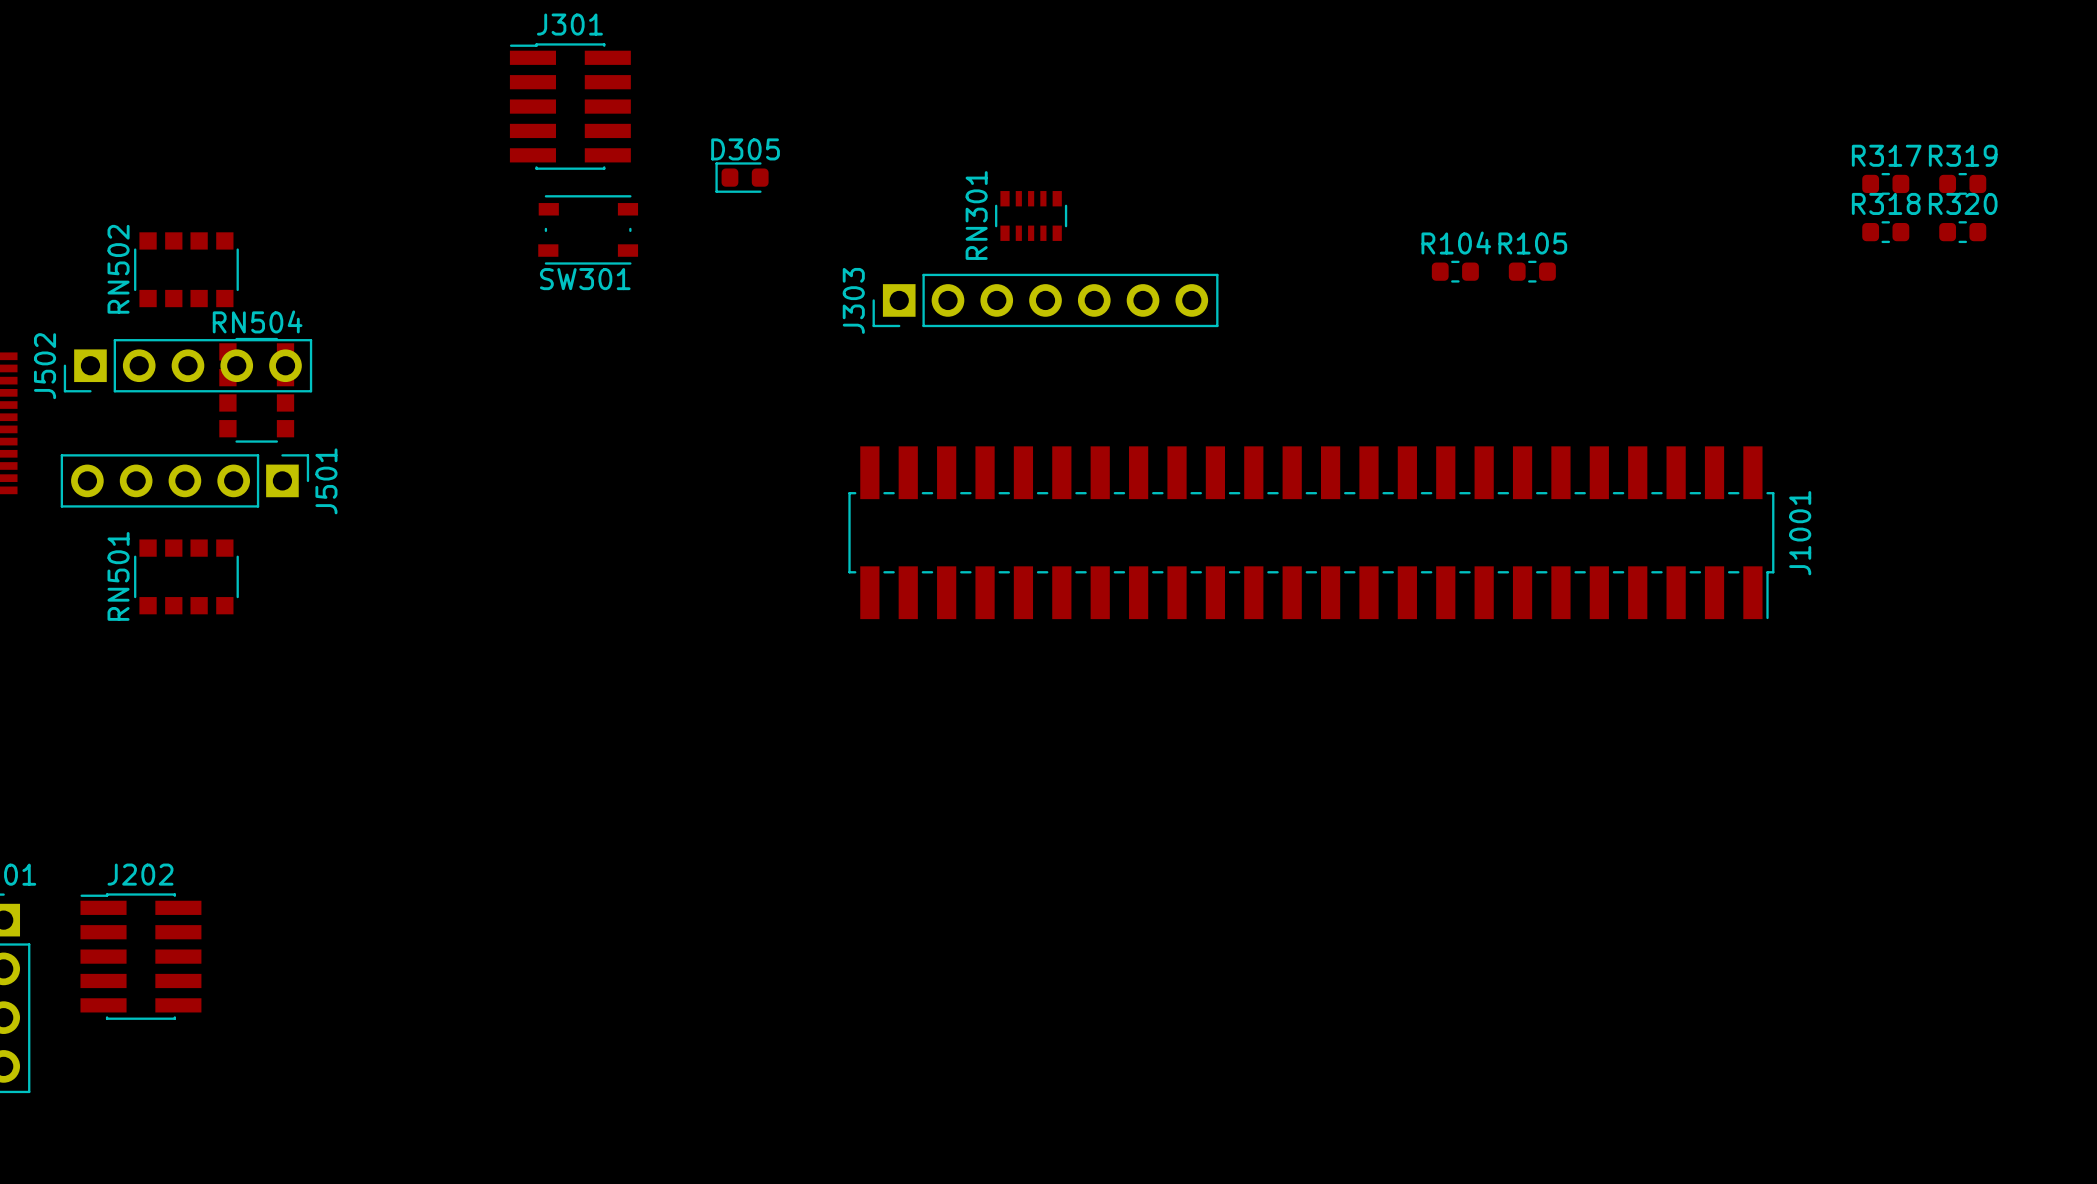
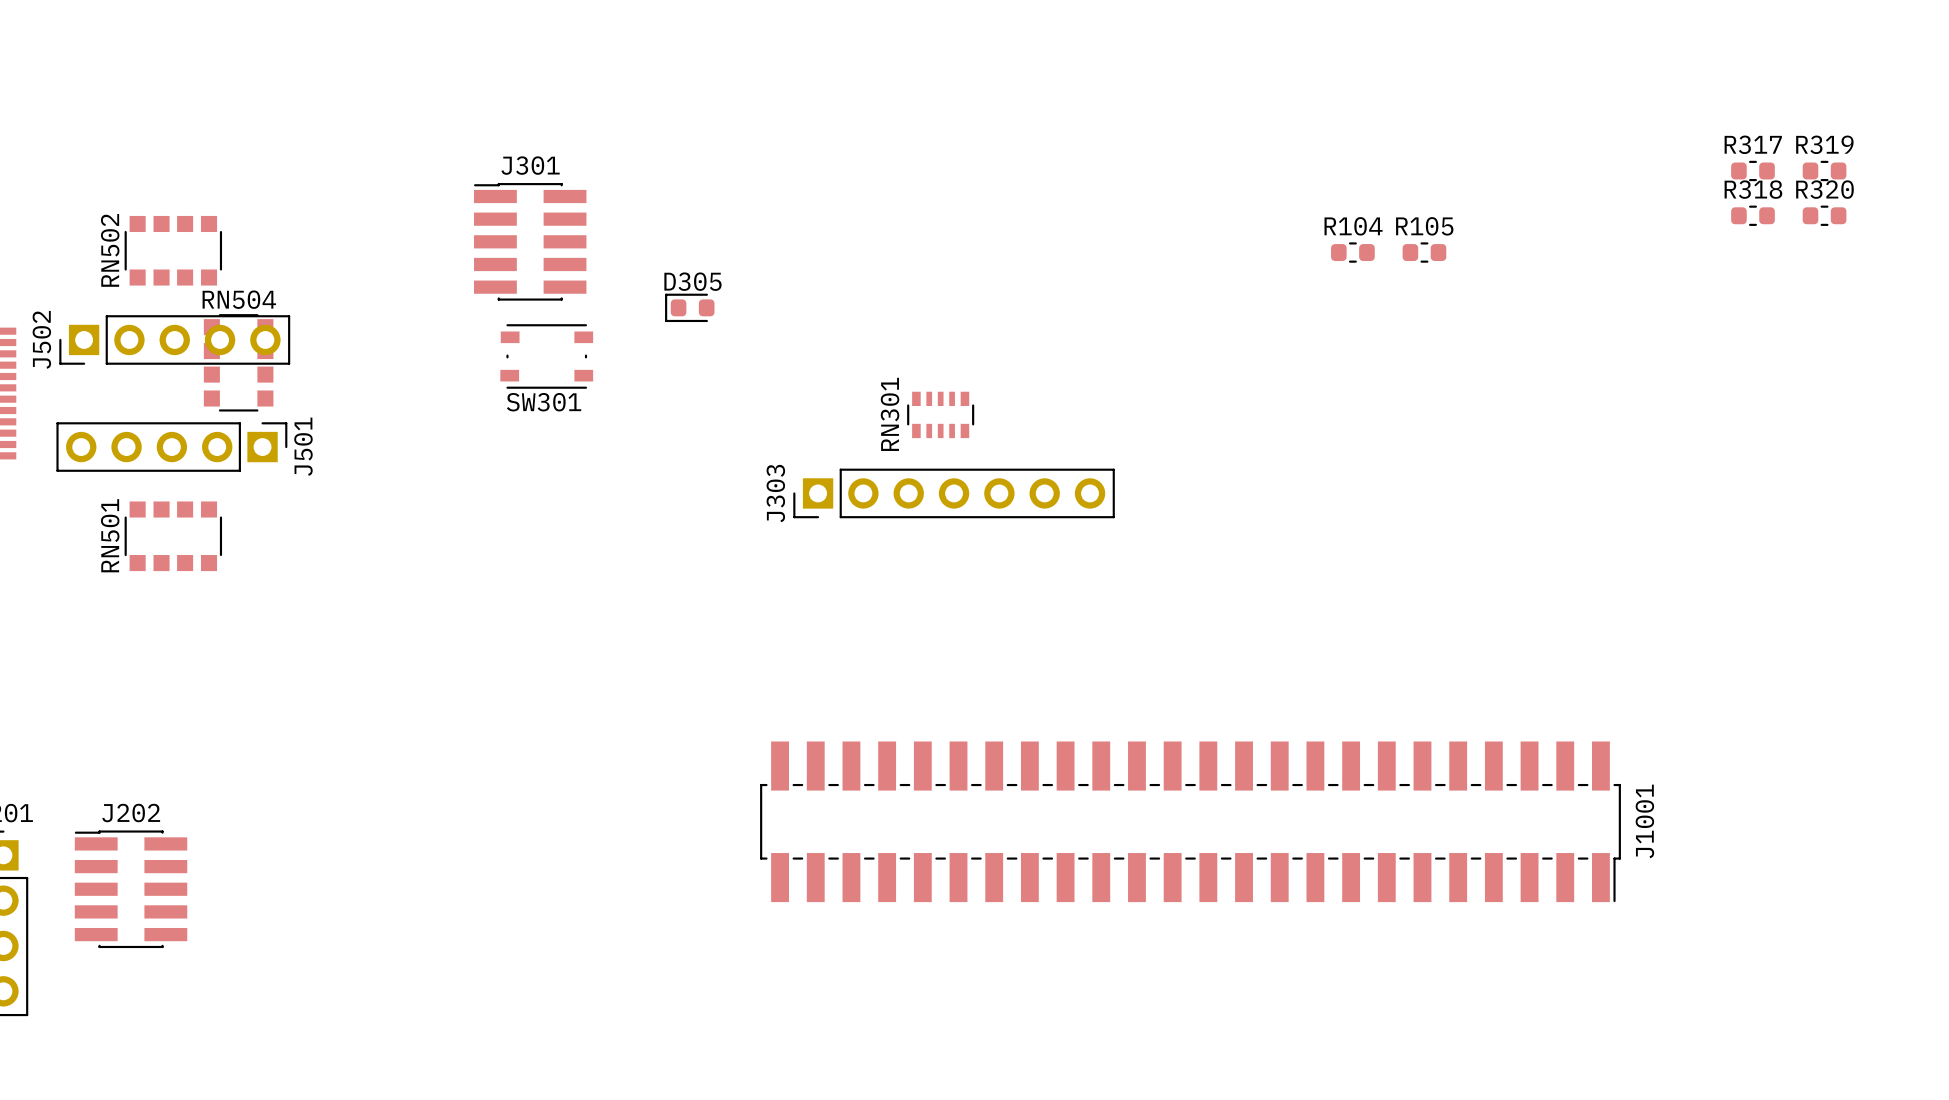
J301 position: (570, 106) -> (530, 241)
D305 position: (742, 177) -> (689, 307)
RN301 position: (1031, 215) -> (940, 414)
SW301 position: (588, 229) -> (546, 356)
J303 position: (1045, 300) -> (954, 493)
J1001 position: (1311, 532) -> (1190, 821)

